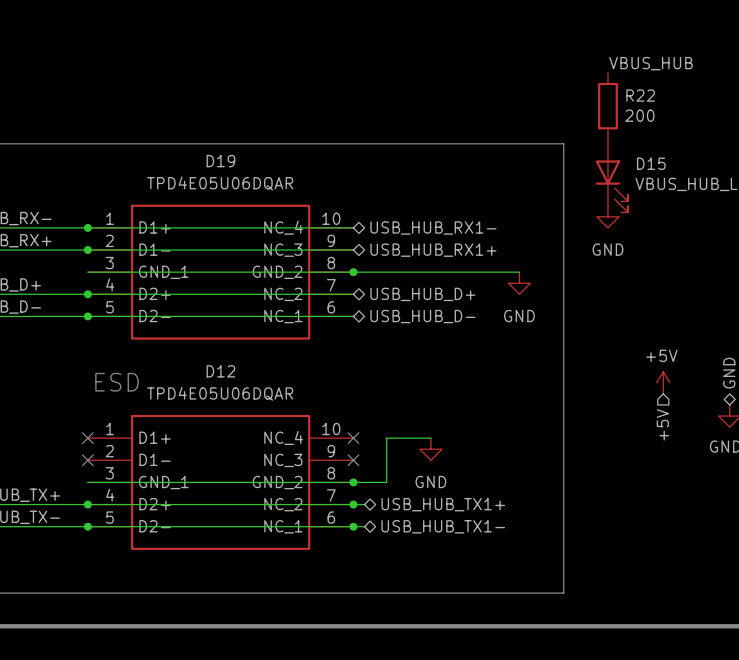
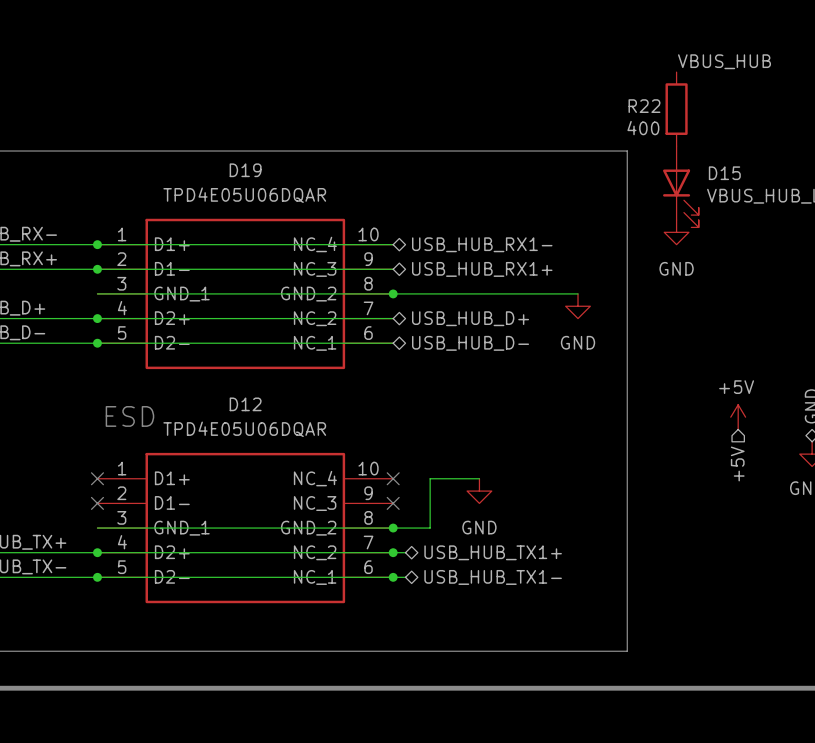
R22 name position: R22 (640, 95) -> R22 (644, 106)
R22 value: 200 (639, 115) -> 400 (643, 128)

